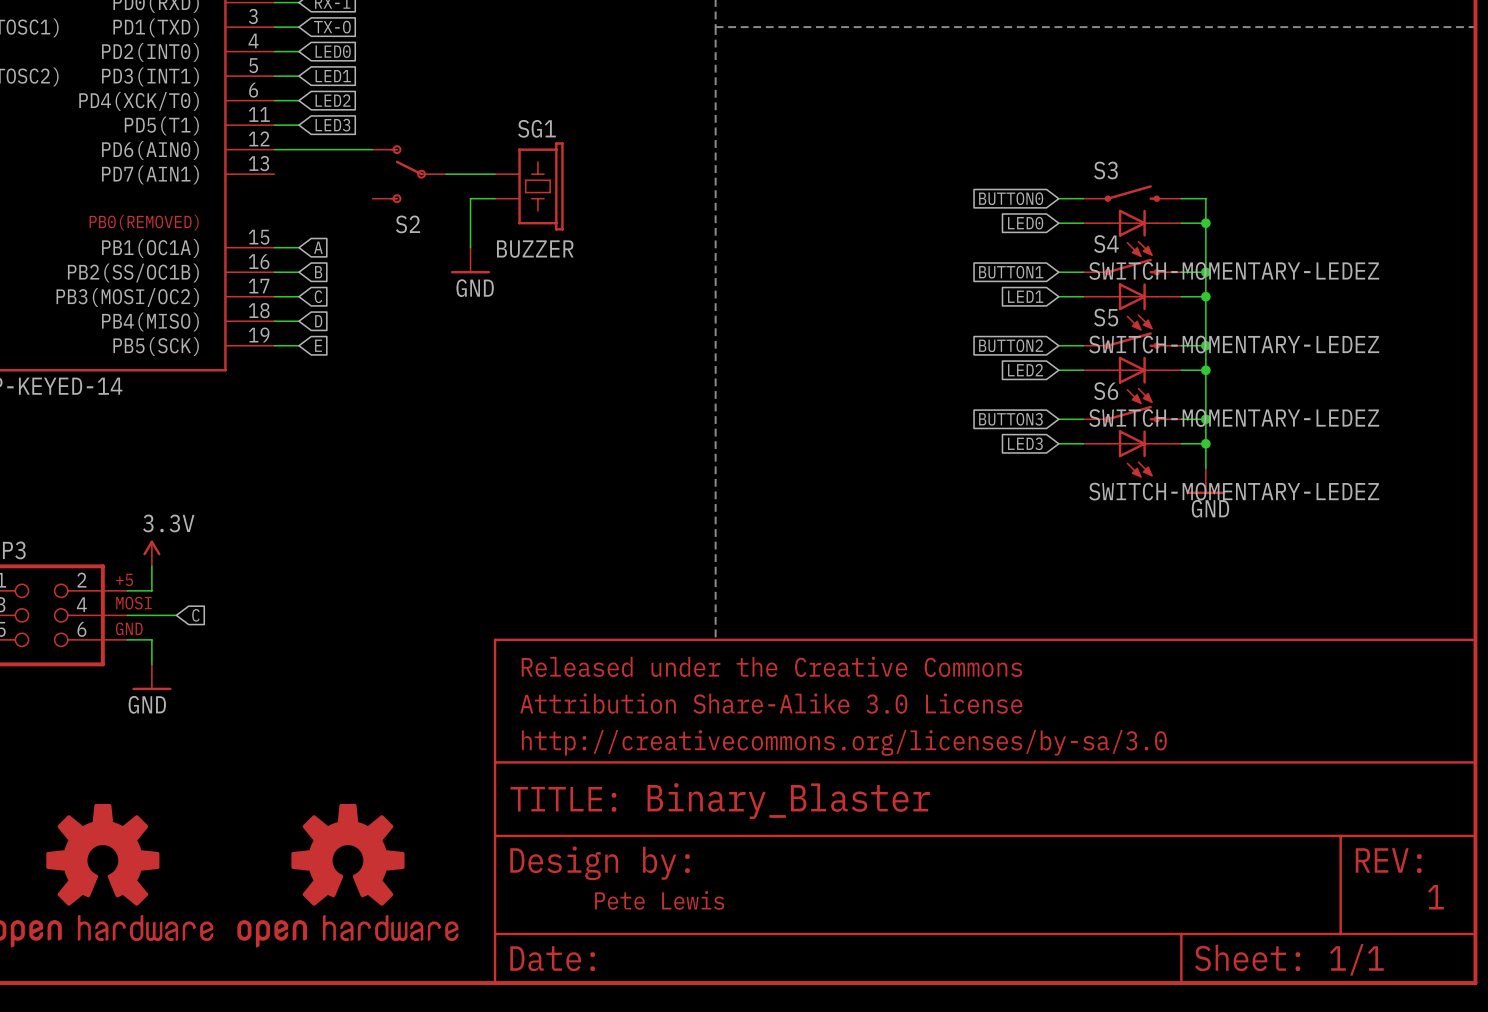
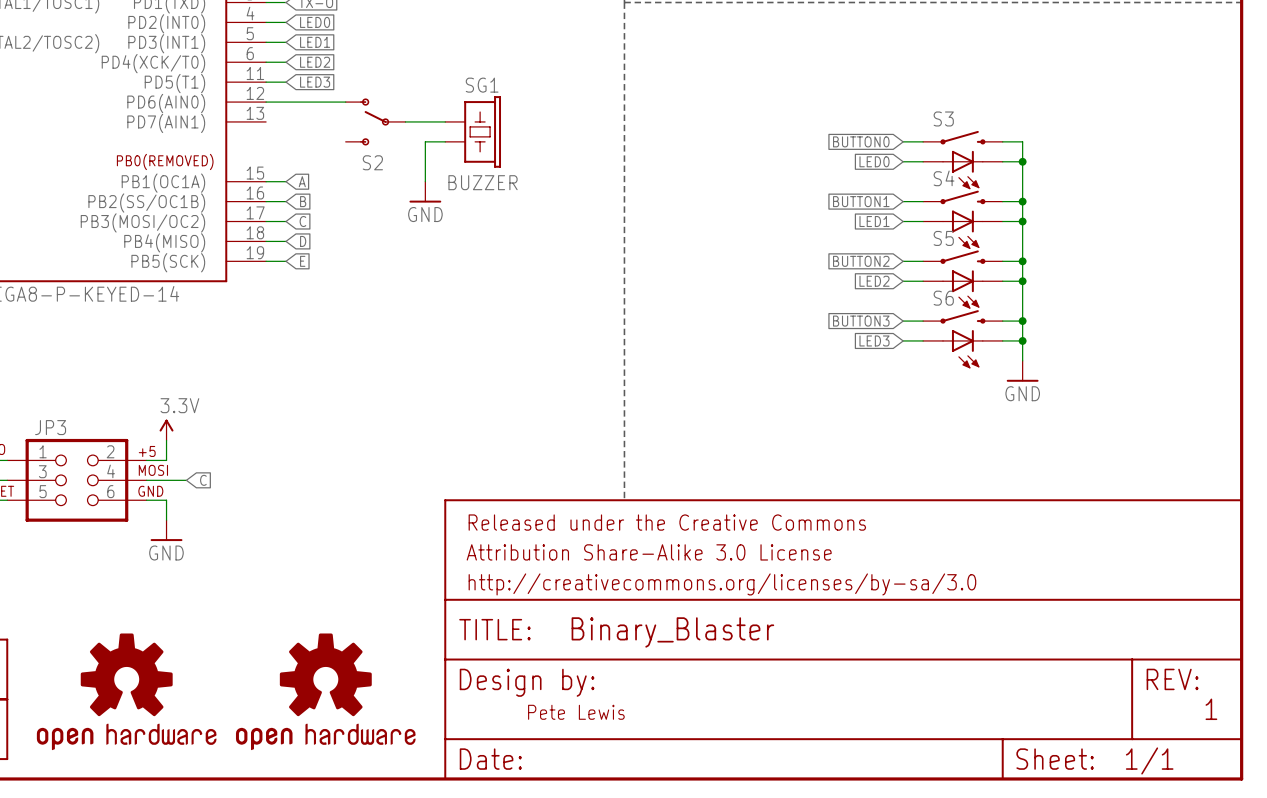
S3 value: SWITCH-MOMENTARY-LEDEZ (1234, 270) -> none
S4 value: SWITCH-MOMENTARY-LEDEZ (1234, 344) -> none
S5 value: SWITCH-MOMENTARY-LEDEZ (1234, 418) -> none
S6 value: SWITCH-MOMENTARY-LEDEZ (1234, 491) -> none

